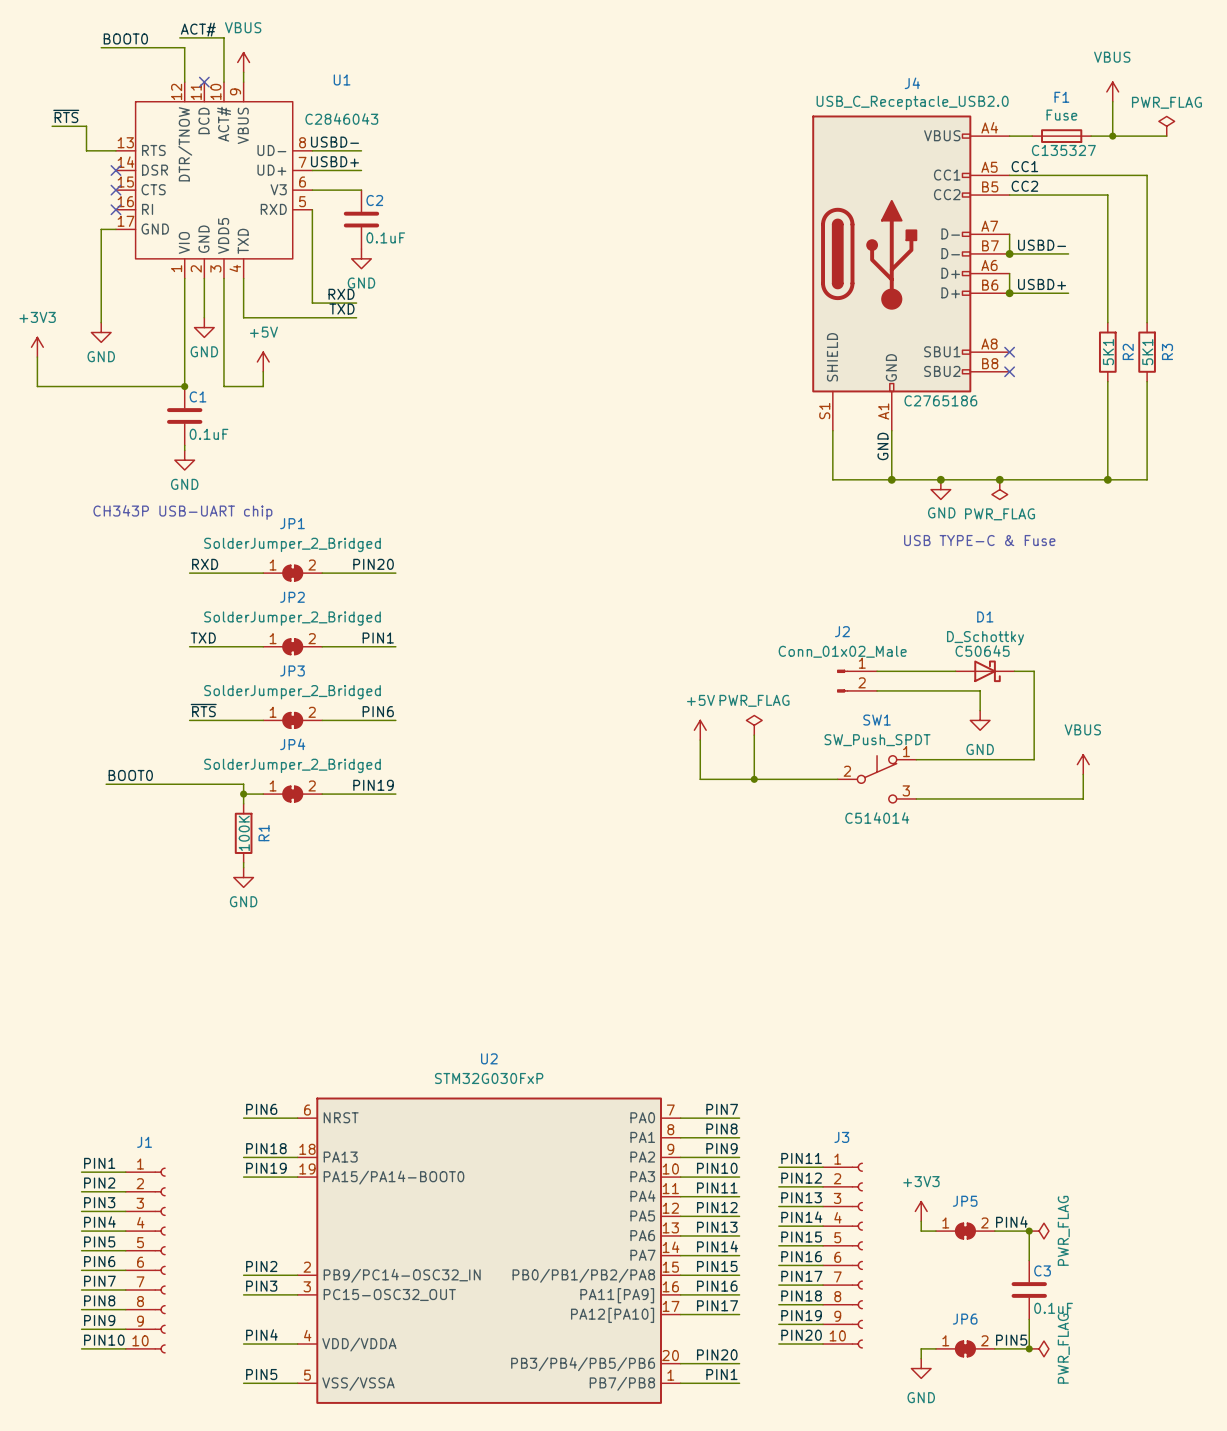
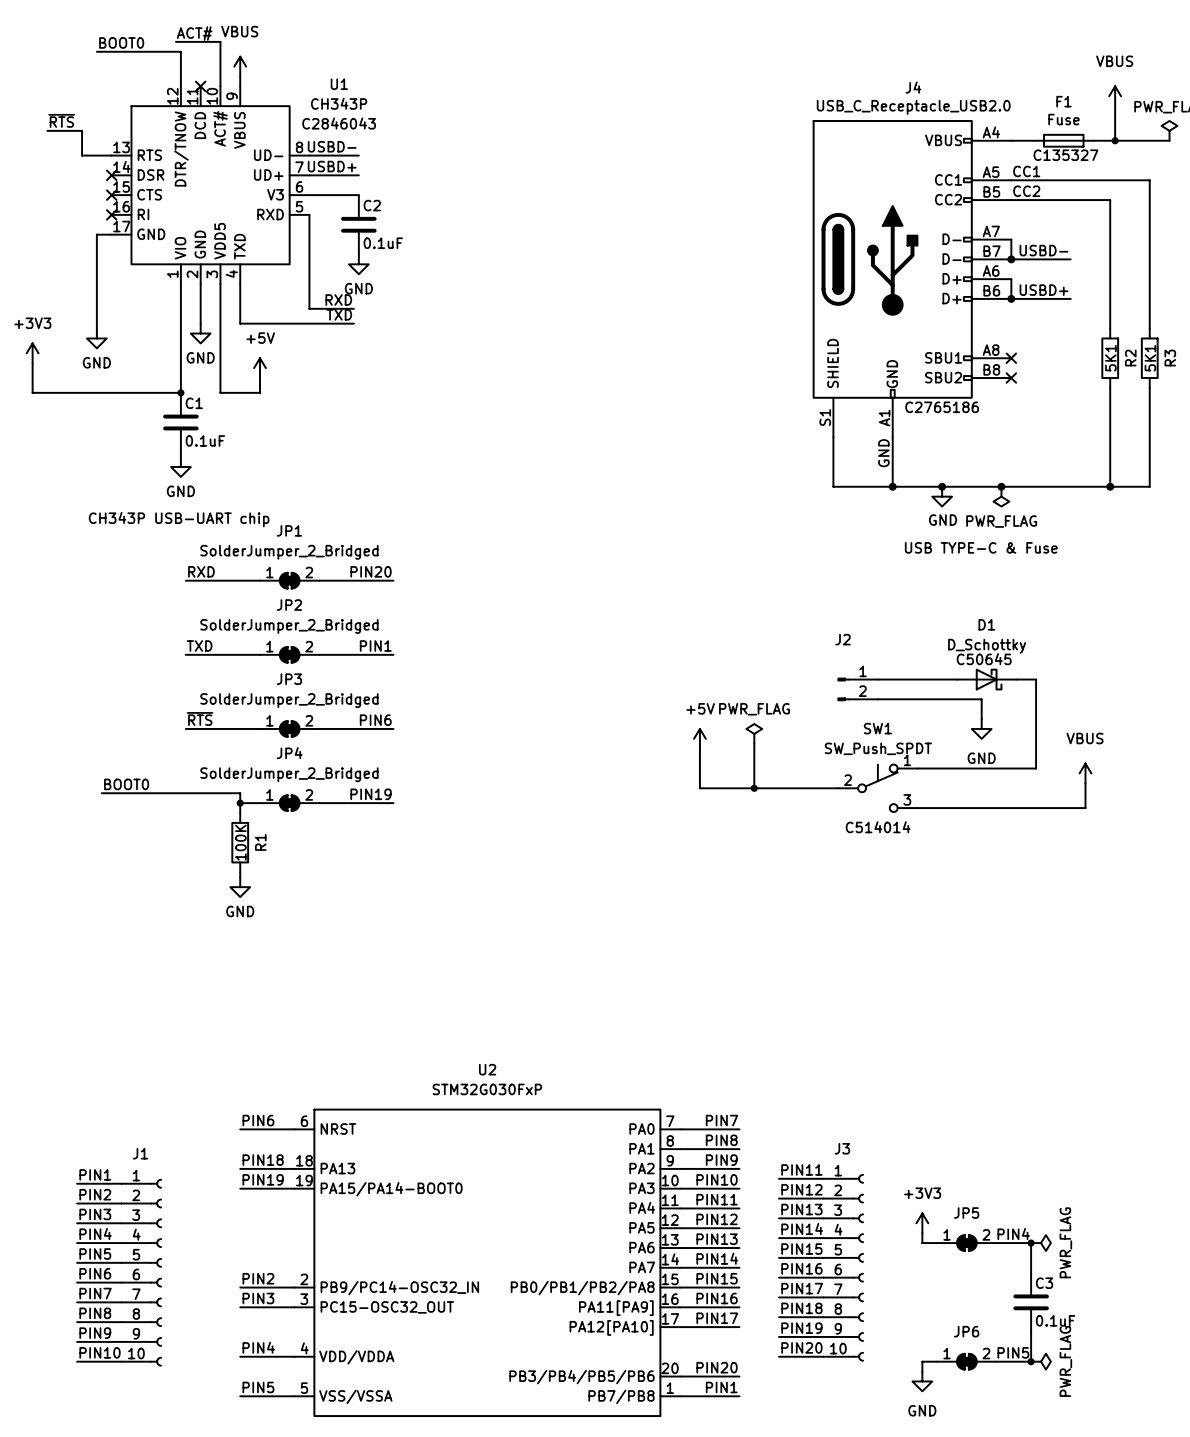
U1 value: none -> CH343P (339, 103)
J2 value: Conn_01x02_Male (842, 651) -> none

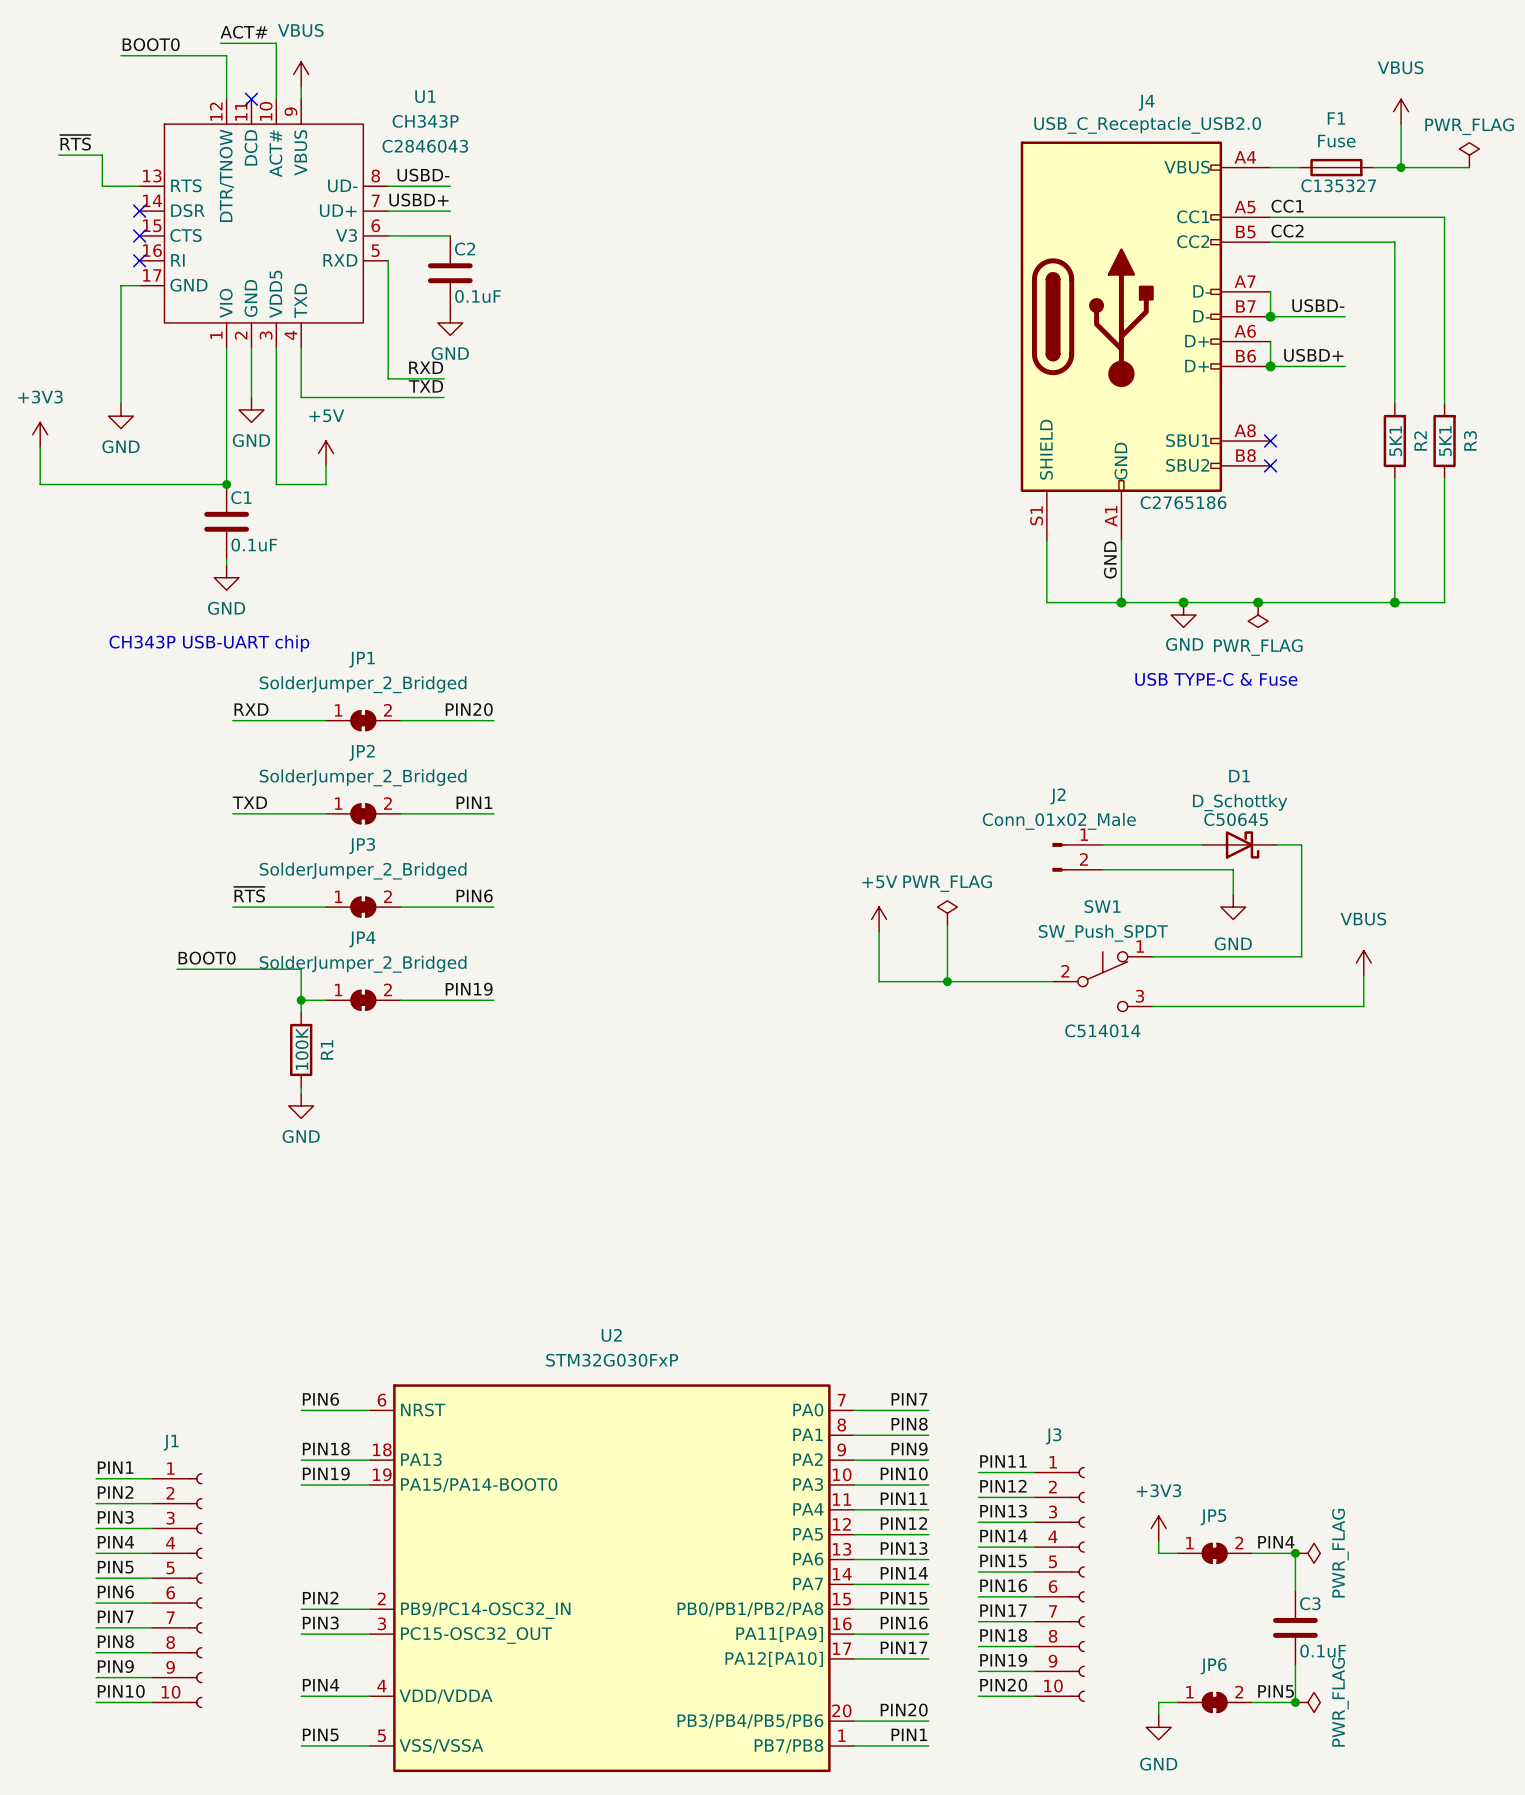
J2 value: none -> Conn_01x02_Male (1059, 821)
label position: BOOT0 (126, 784) -> BOOT0 (207, 958)
wire: (101, 793) (240, 793) -> (176, 969) (301, 969) (301, 987)

